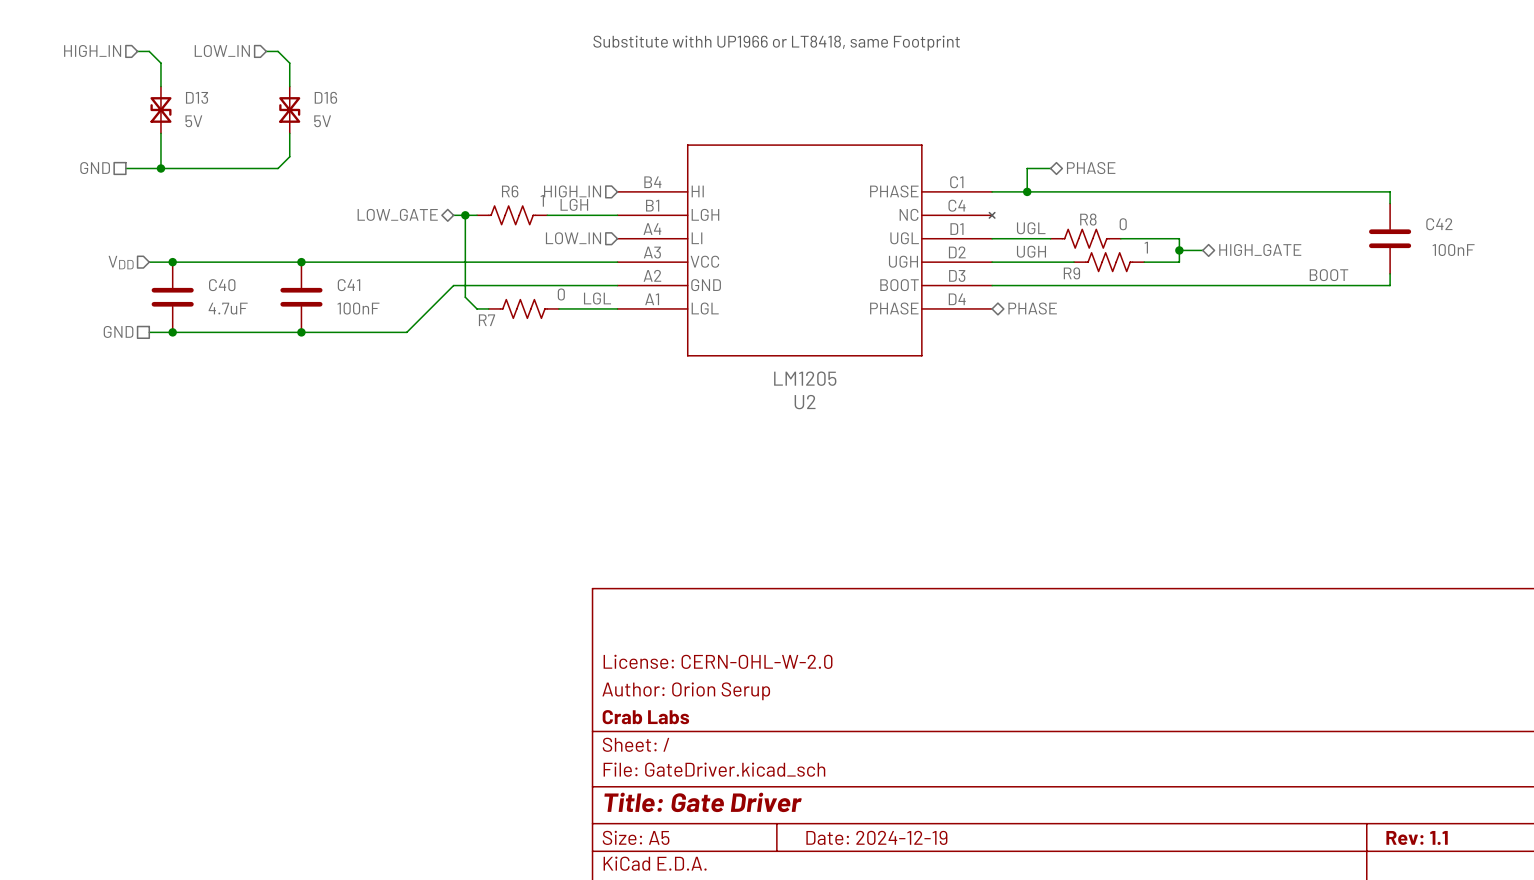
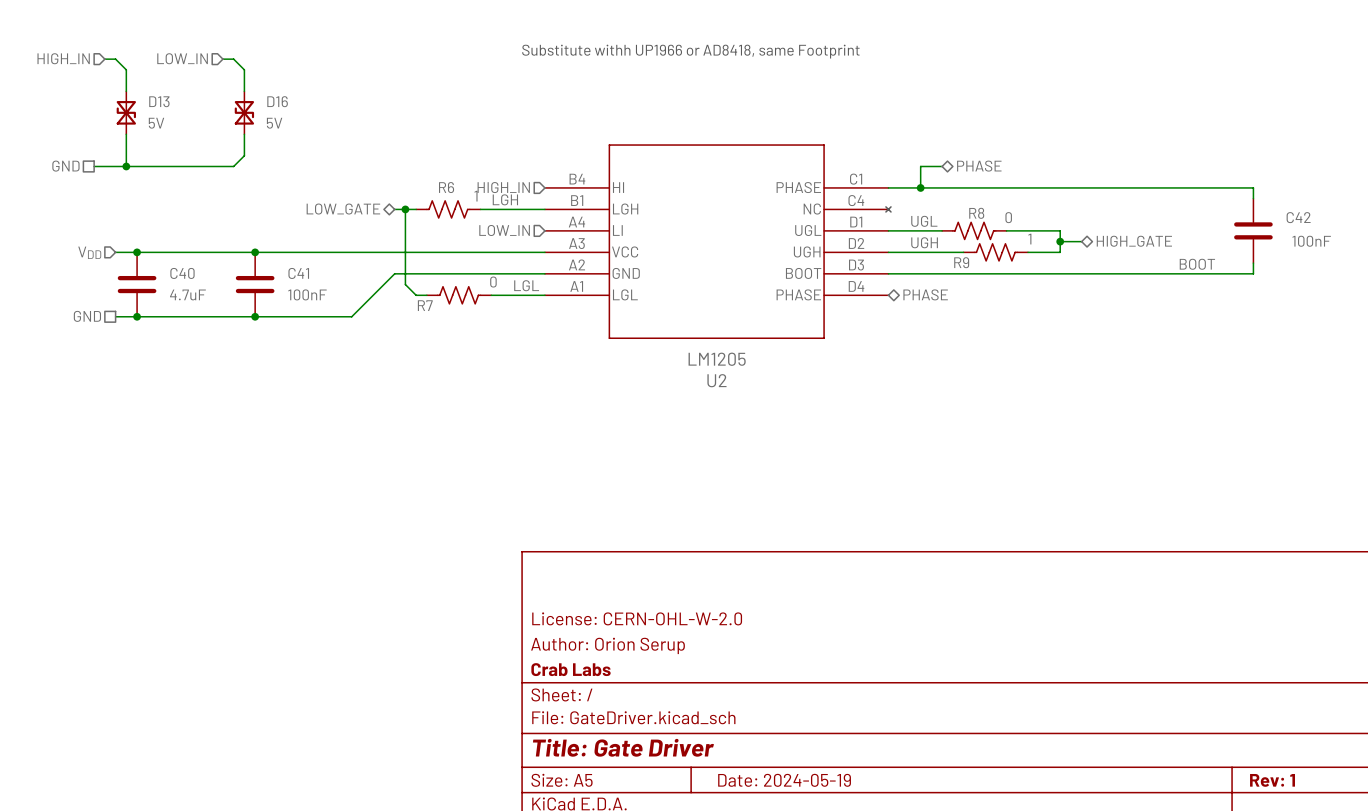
text: Substitute withh UP1966 or LT8418, same Footprint (776, 43) -> Substitute withh UP1966 or AD8418, same Footprint (690, 51)
title block: Date: 2024-12-19 (876, 837) -> Date: 2024-05-19 (784, 780)
title block: Rev: 1.1 (1417, 837) -> Rev: 1 (1272, 780)

